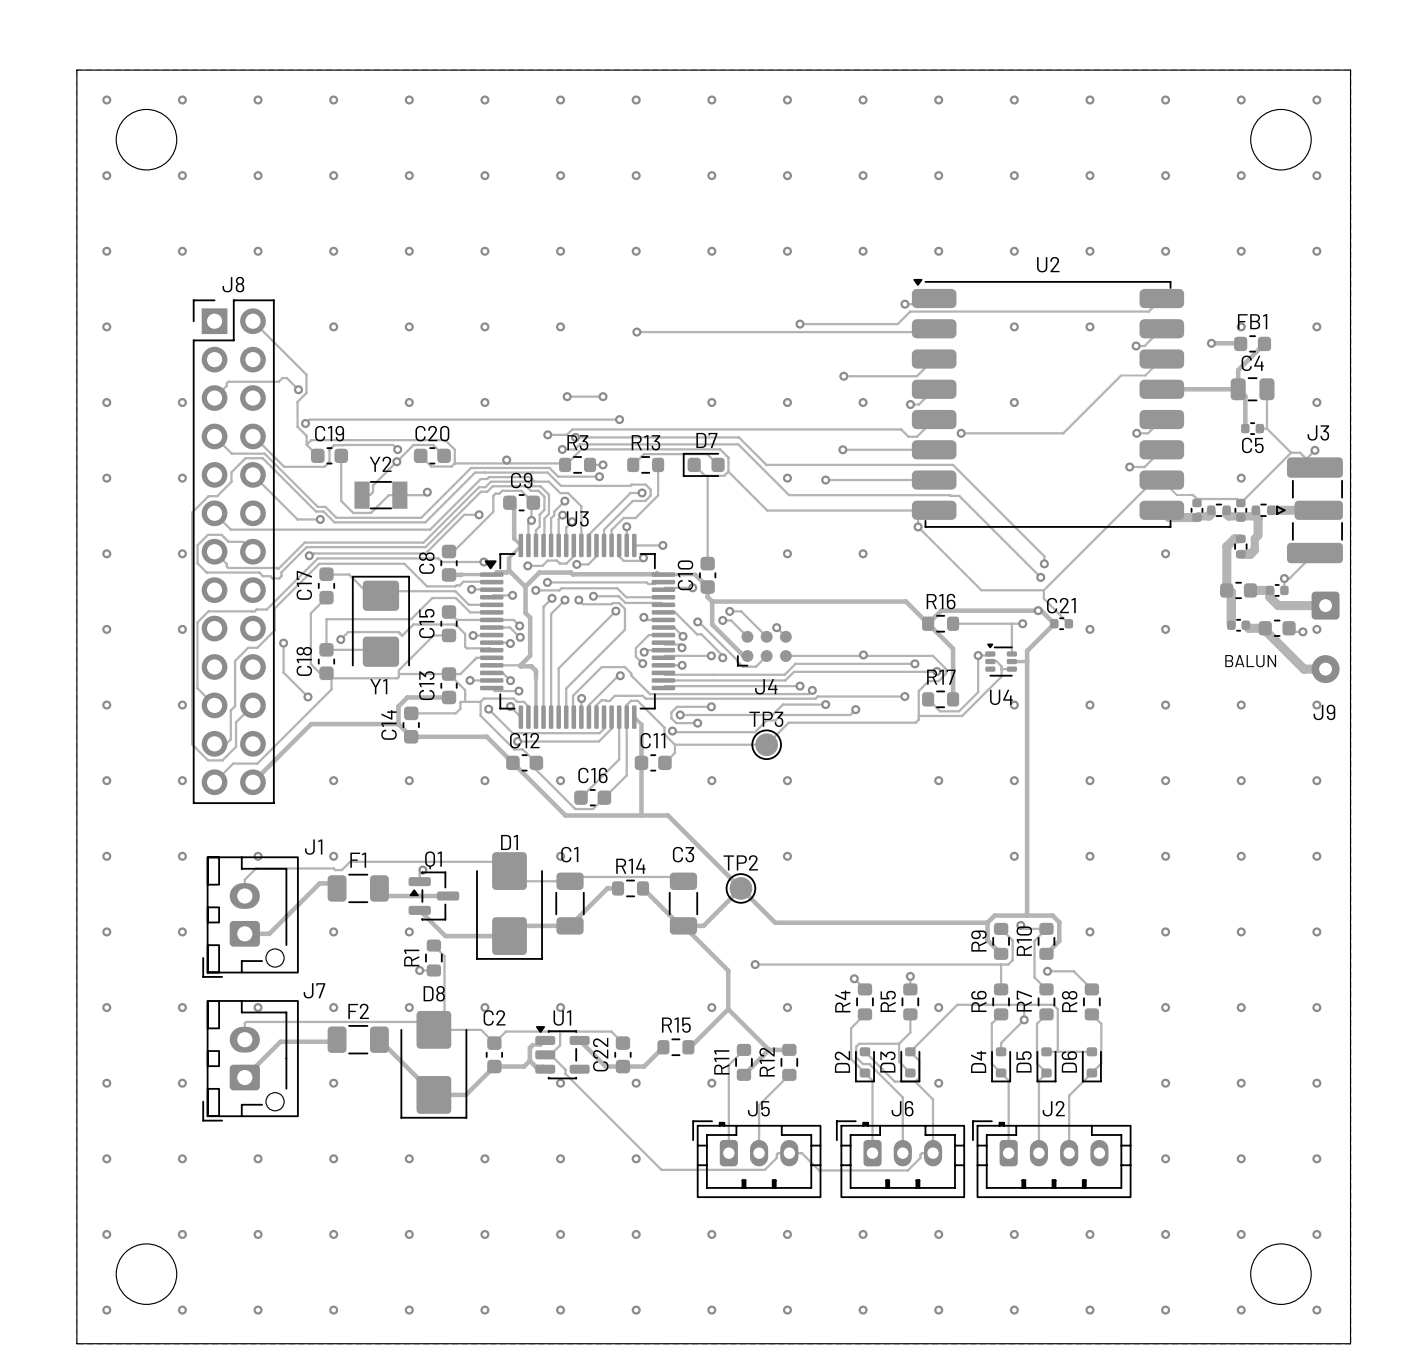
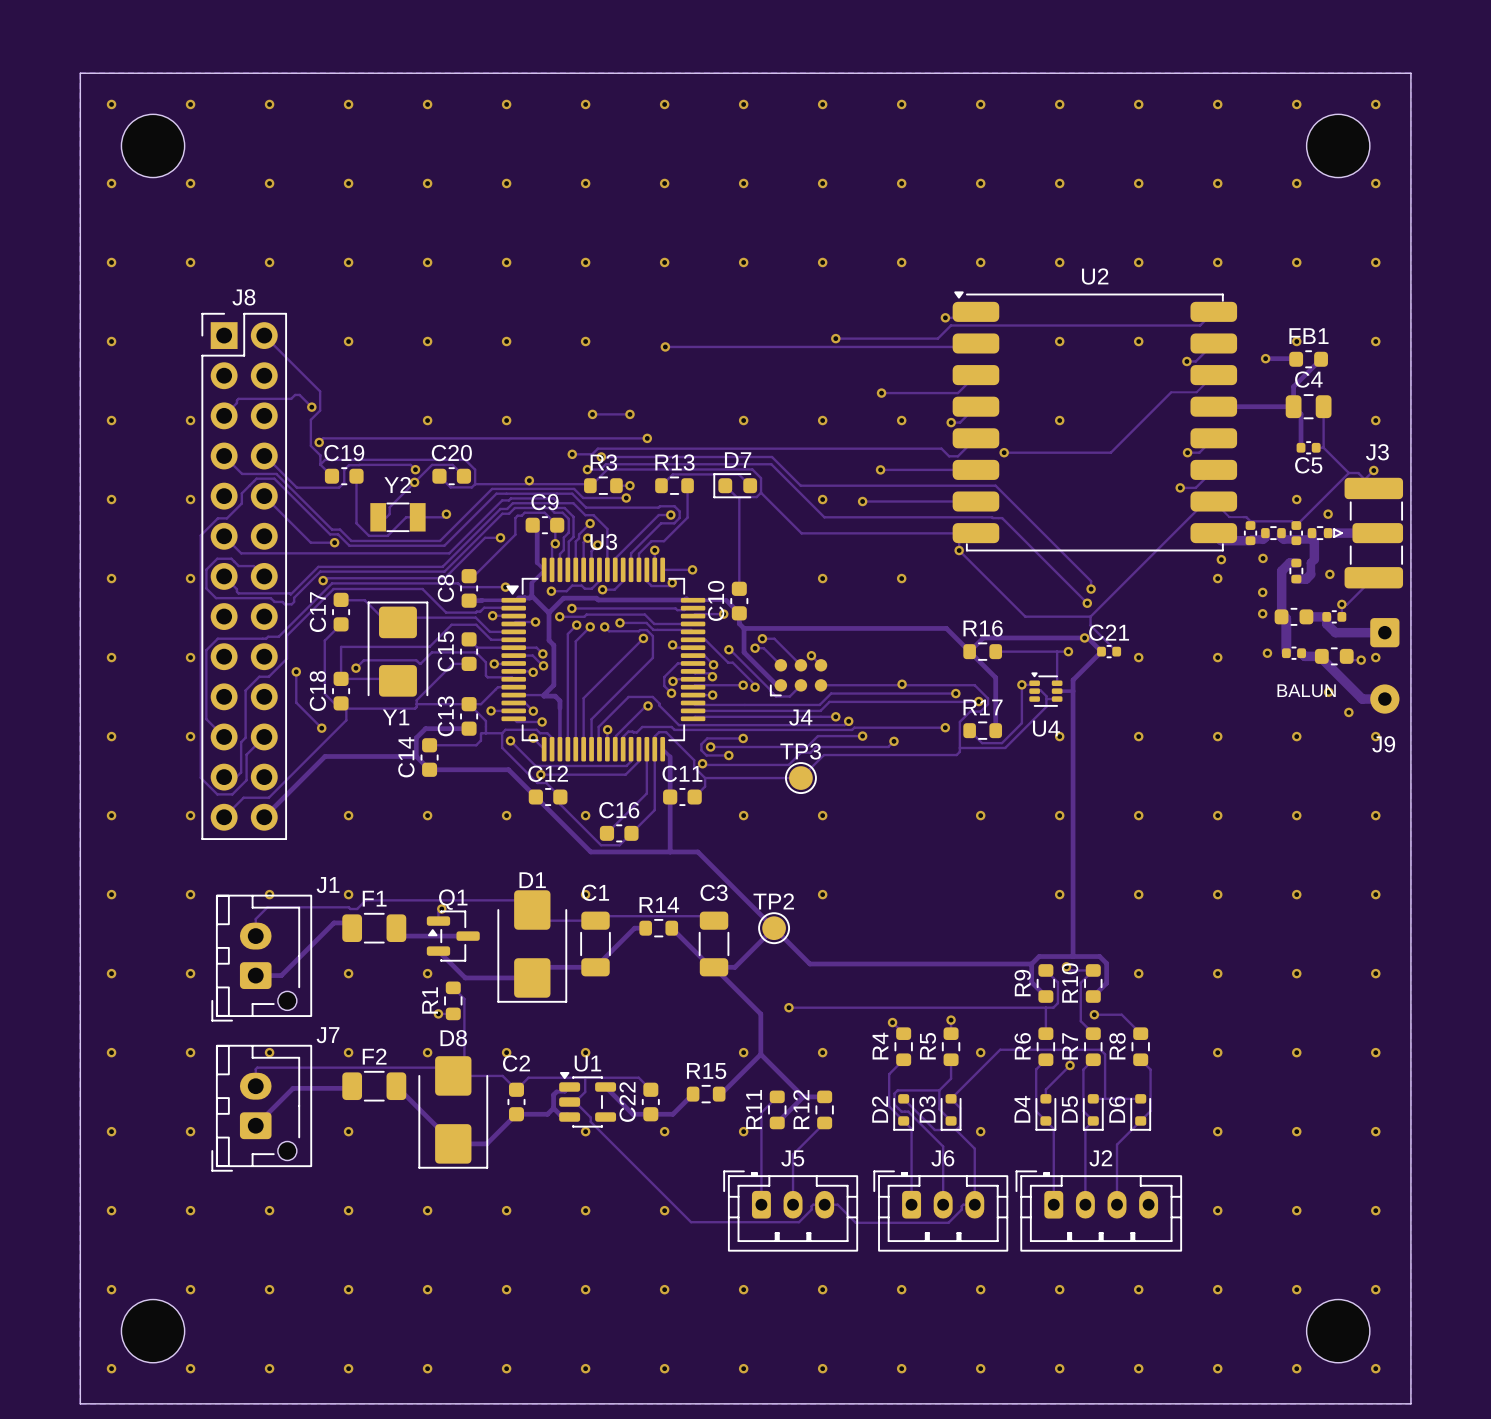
via: none -> (1328, 514)
via: none -> (1263, 558)
via: none -> (1221, 559)
via: none -> (1329, 574)
via: none -> (1262, 592)
via: none -> (1262, 613)
via: none -> (1267, 653)
via: none -> (1328, 692)
via: none -> (1348, 712)

